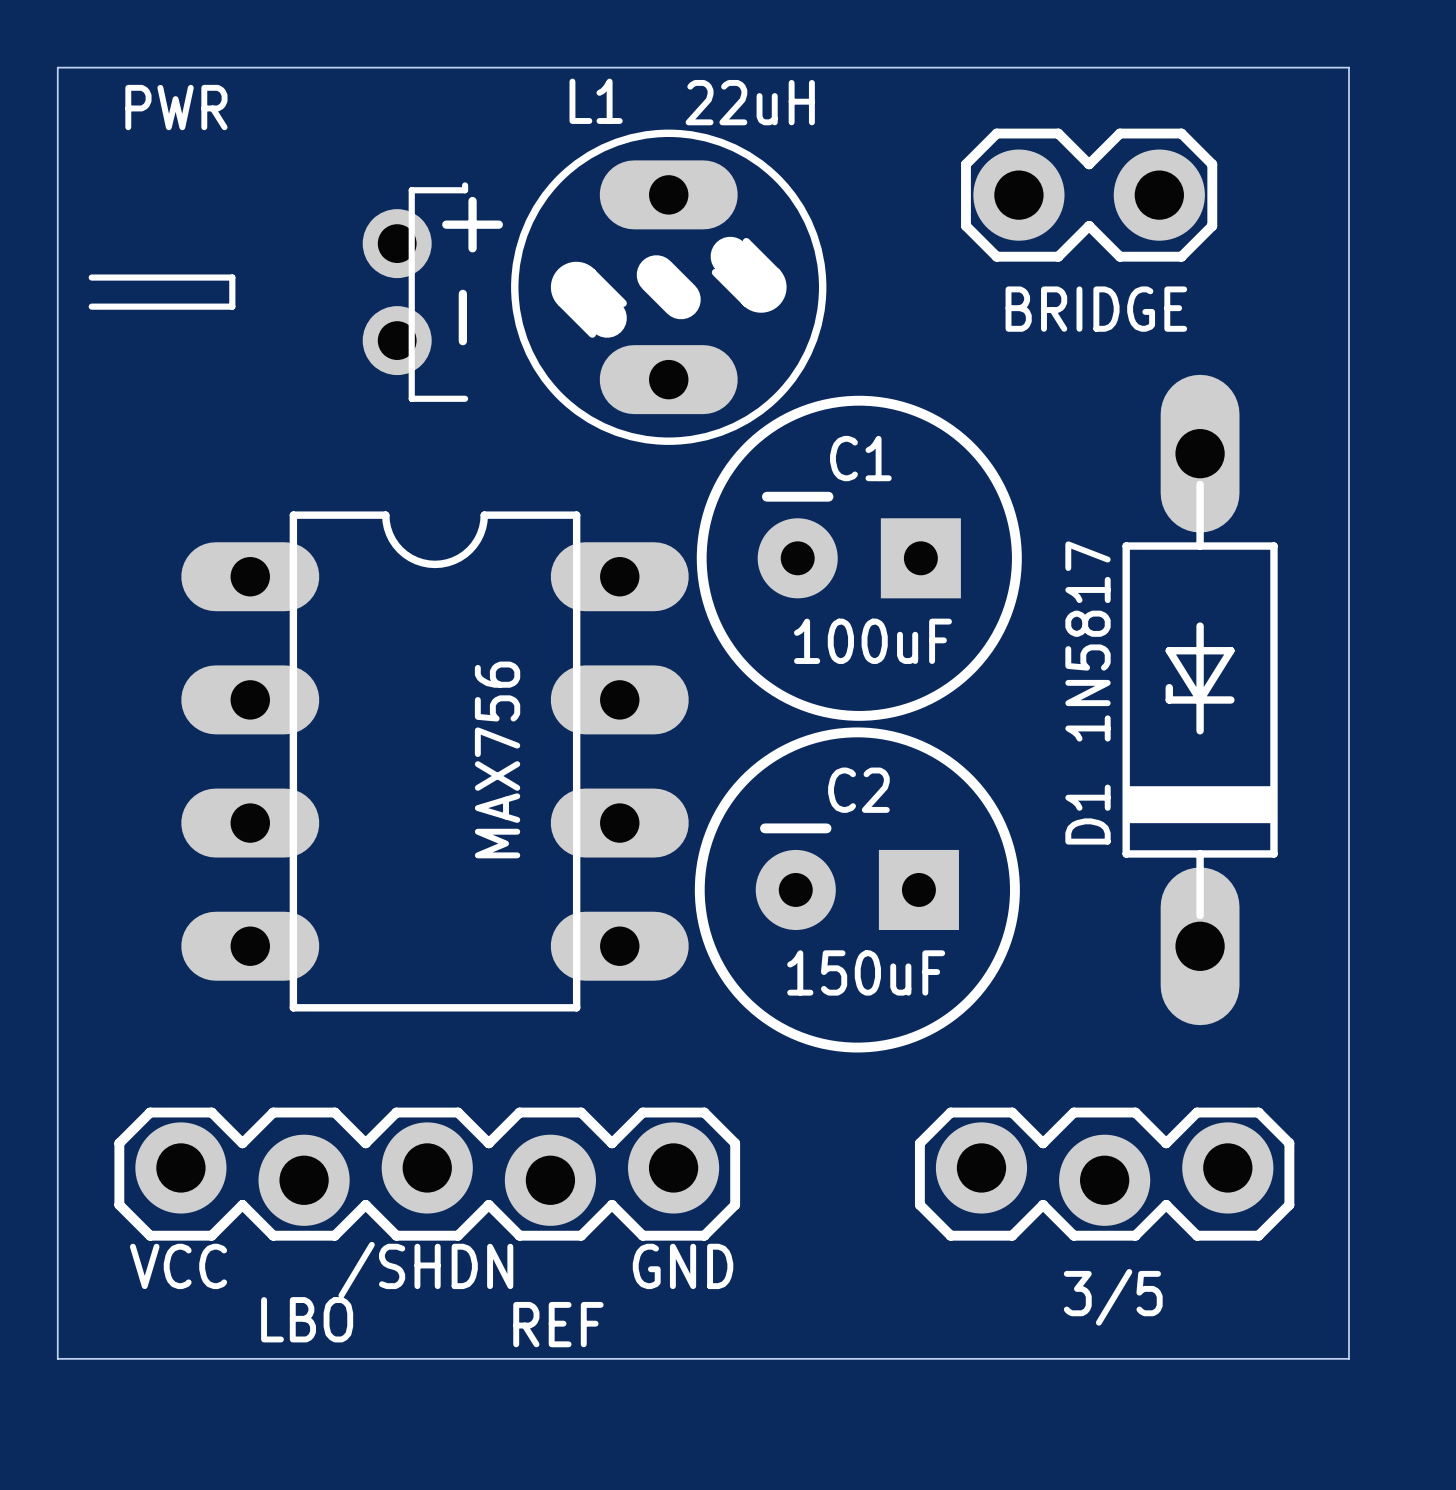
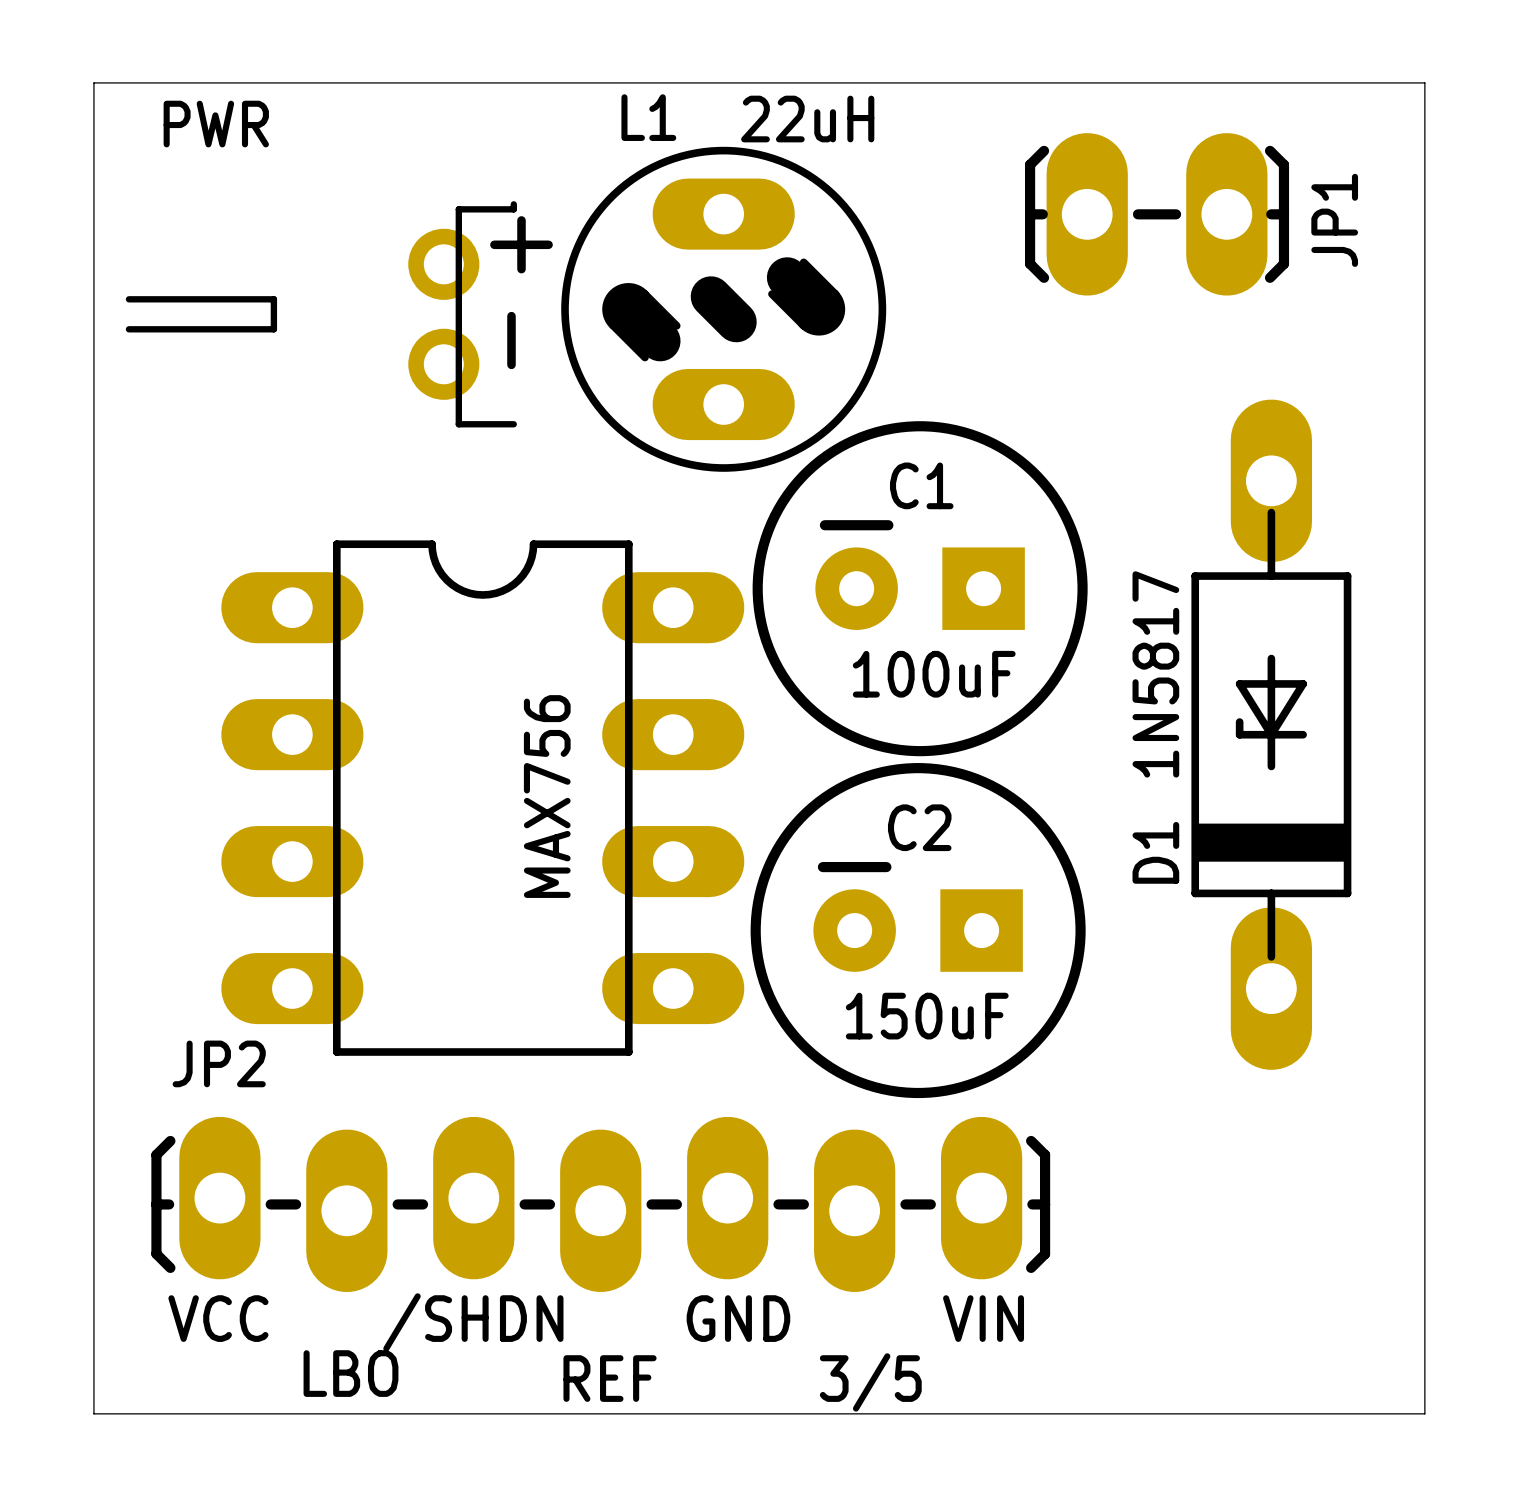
BRIDGE: (1089, 195) -> none
JP1: none -> (1157, 214)
JP2: none -> (600, 1204)
part: (427, 1174) -> none
3/5: (1104, 1174) -> none
text: none -> VIN (983, 1318)
text: none -> 3/5 (870, 1382)

